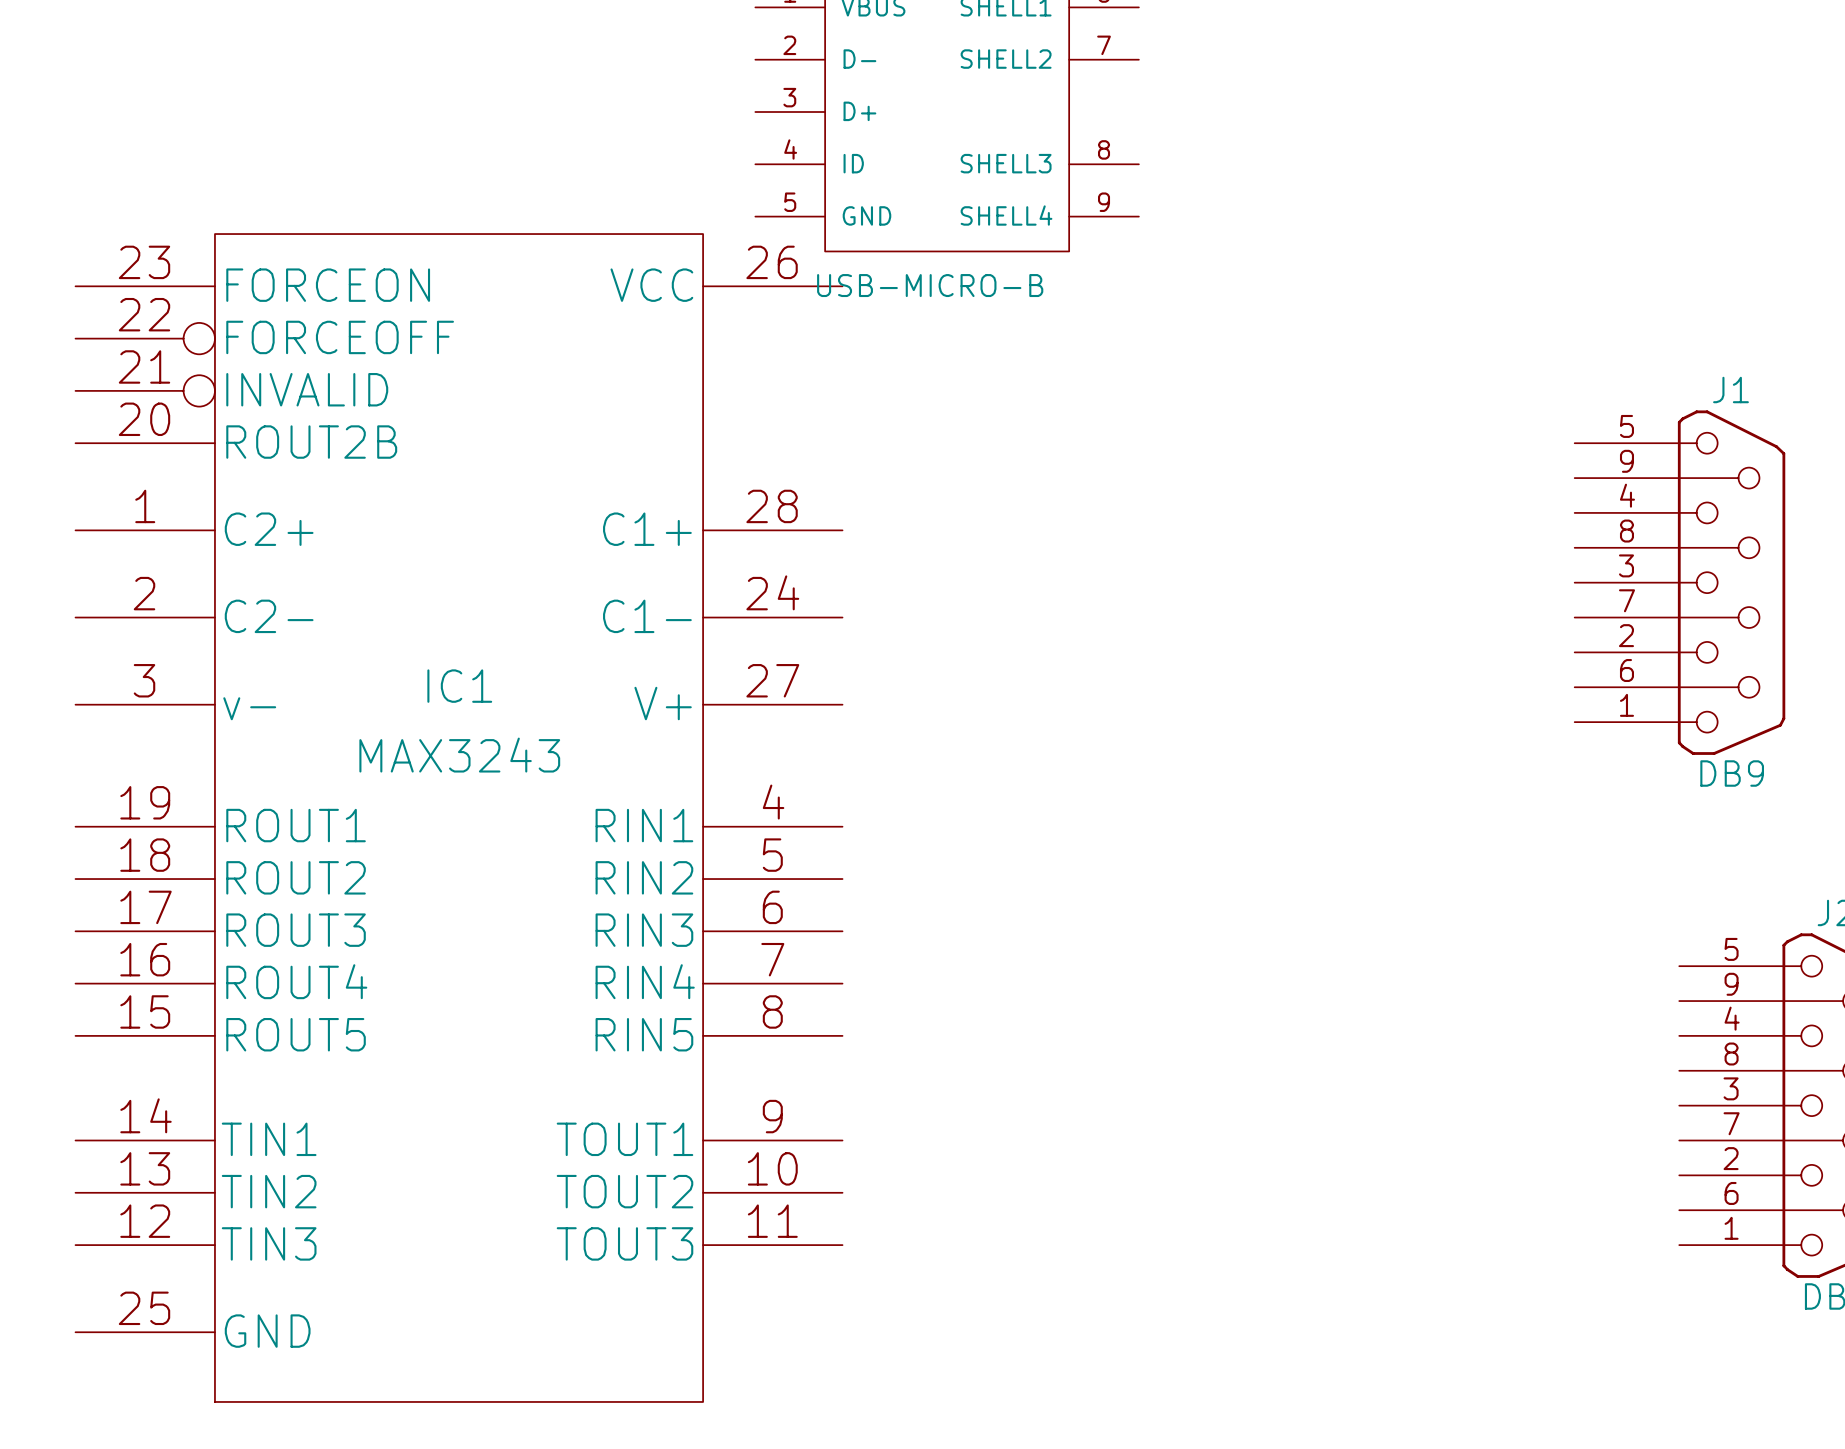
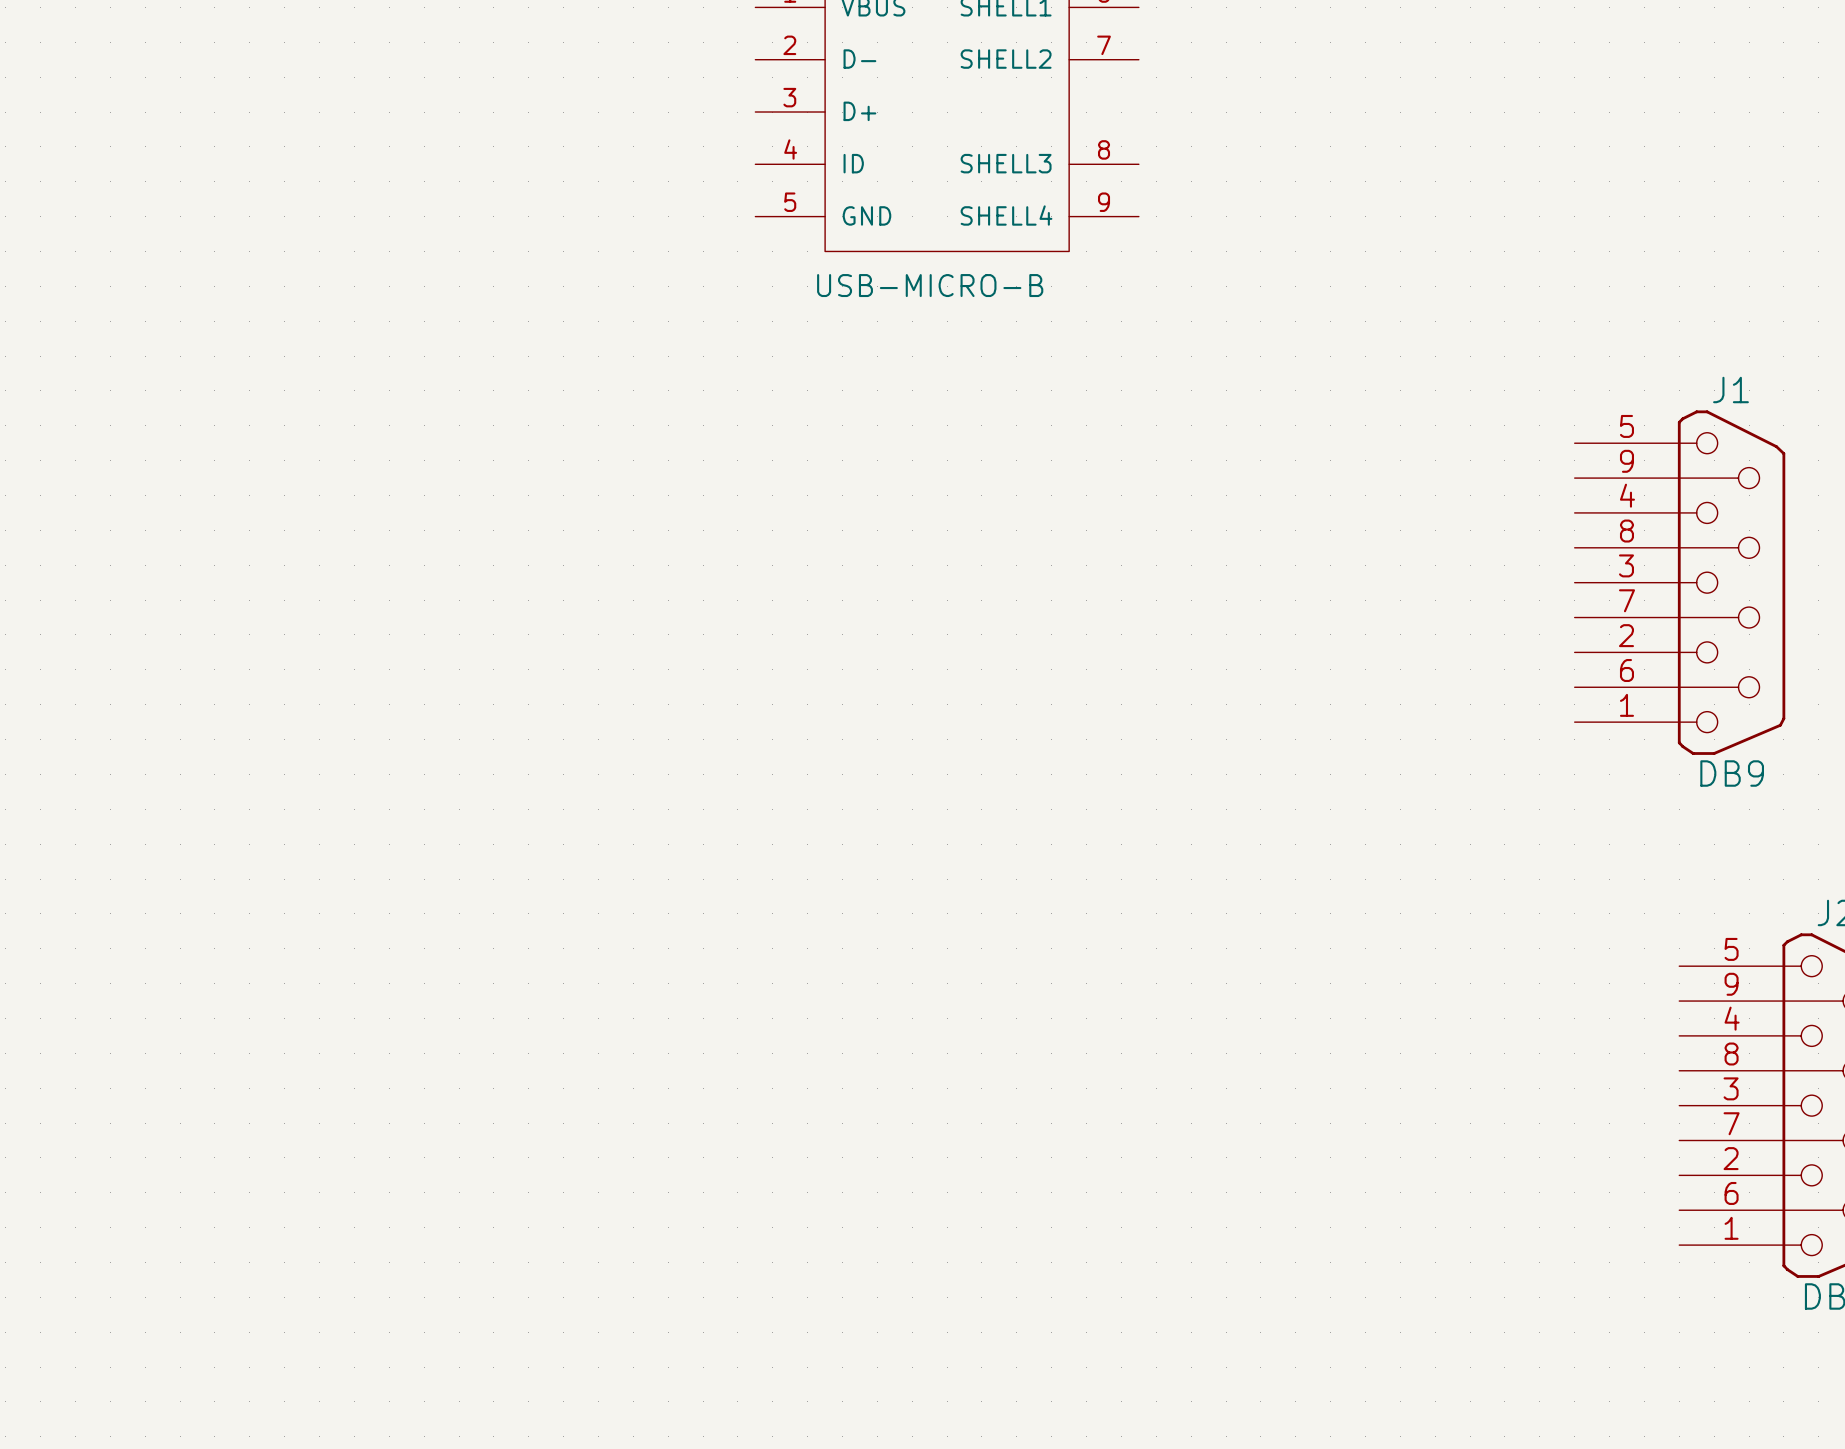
IC1: MAX3243 (459, 818) -> none

